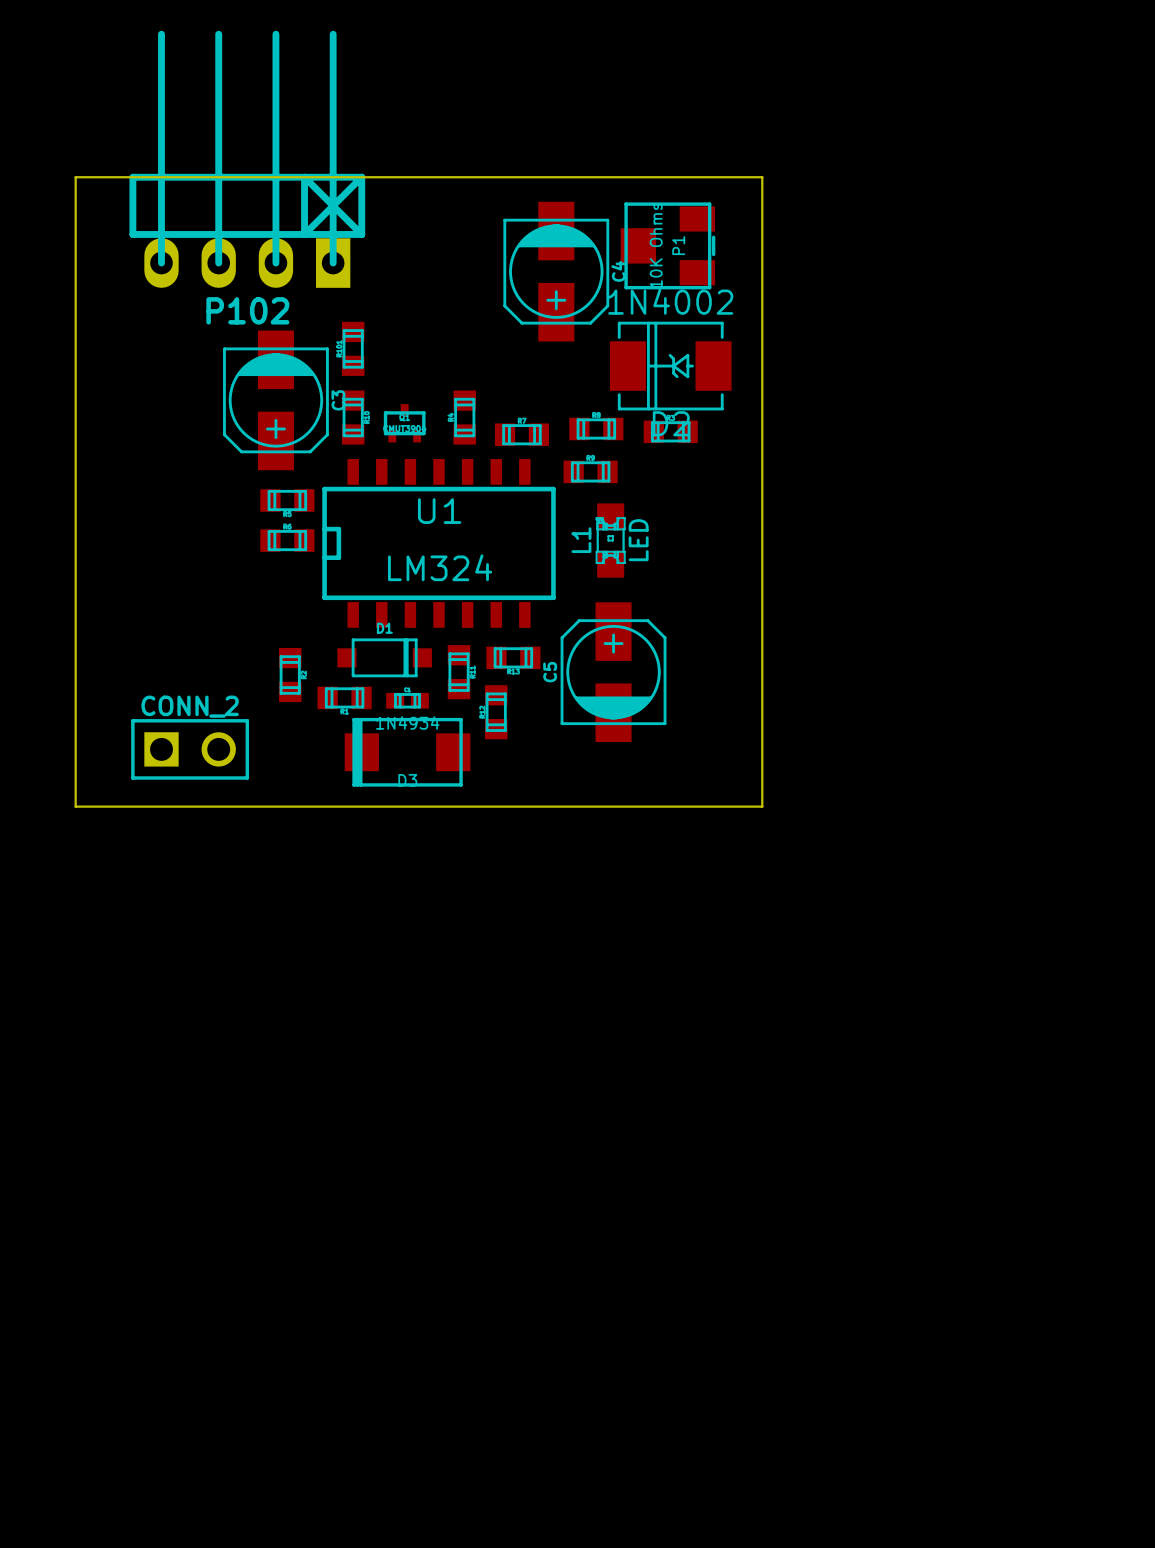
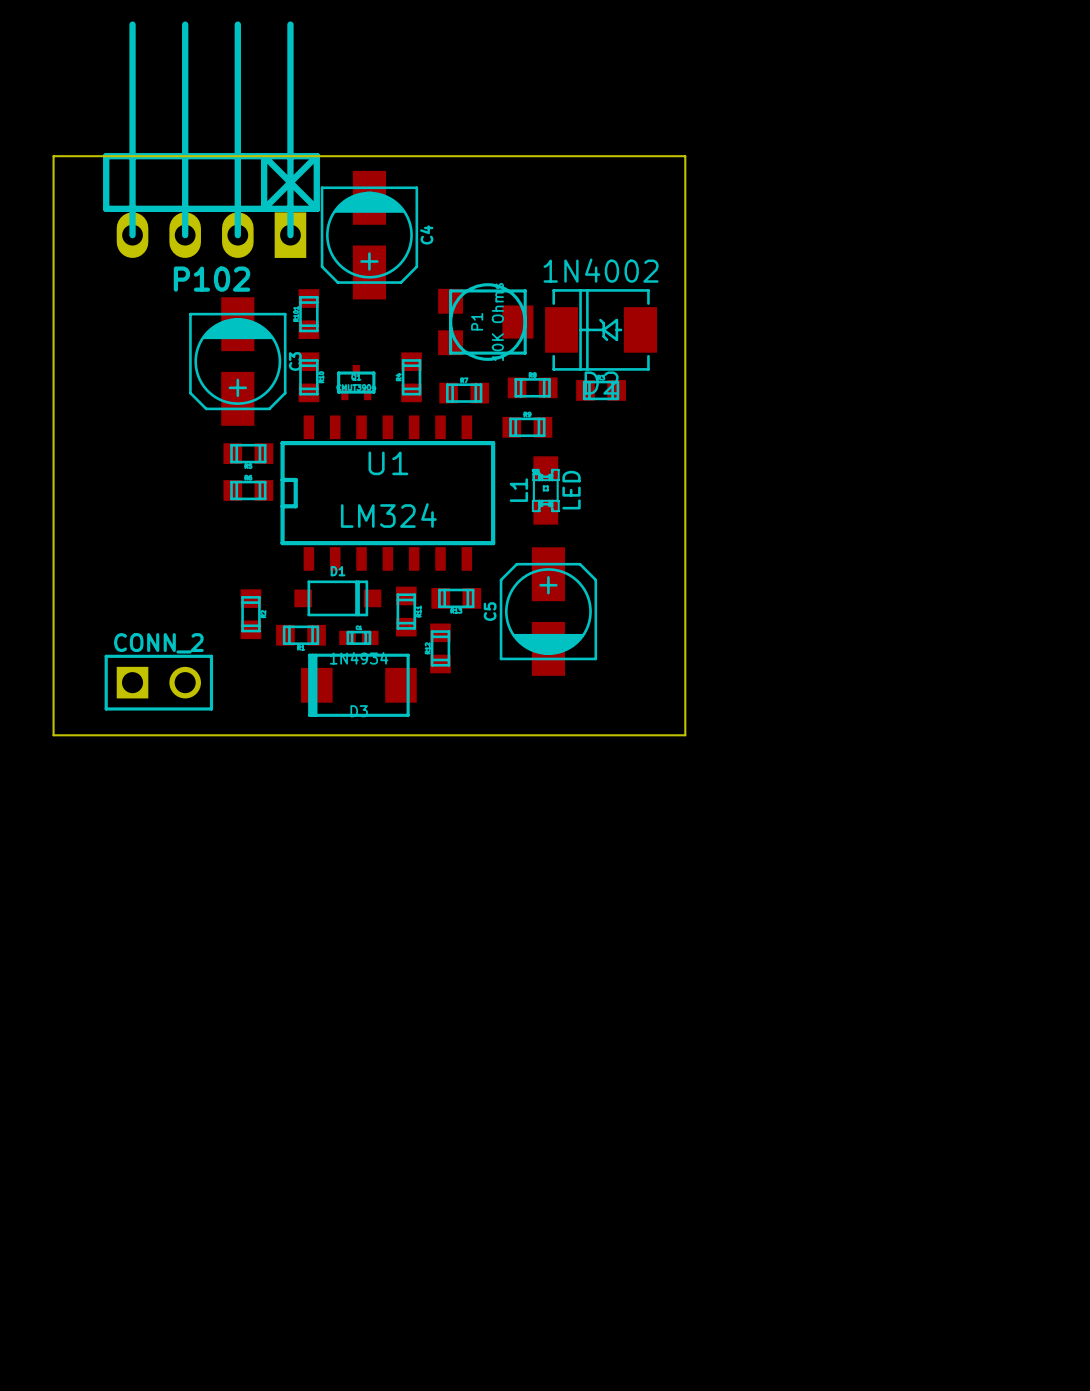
P1 footprint: [620, 202, 716, 290] -> [438, 283, 534, 361]
C4 position: (556, 271) -> (369, 235)

